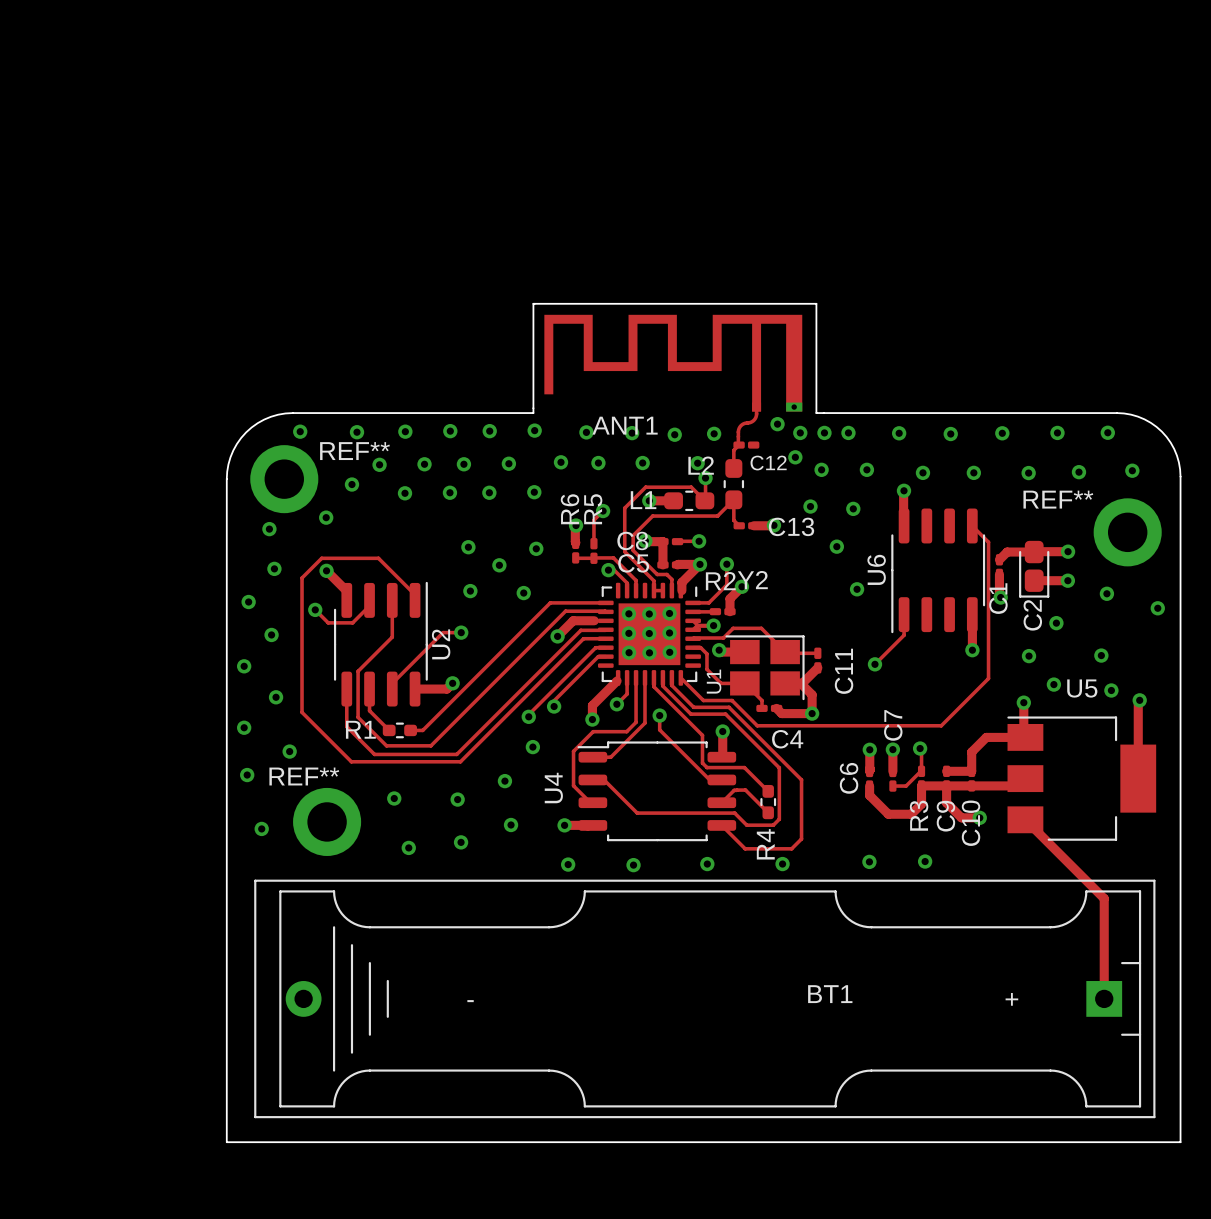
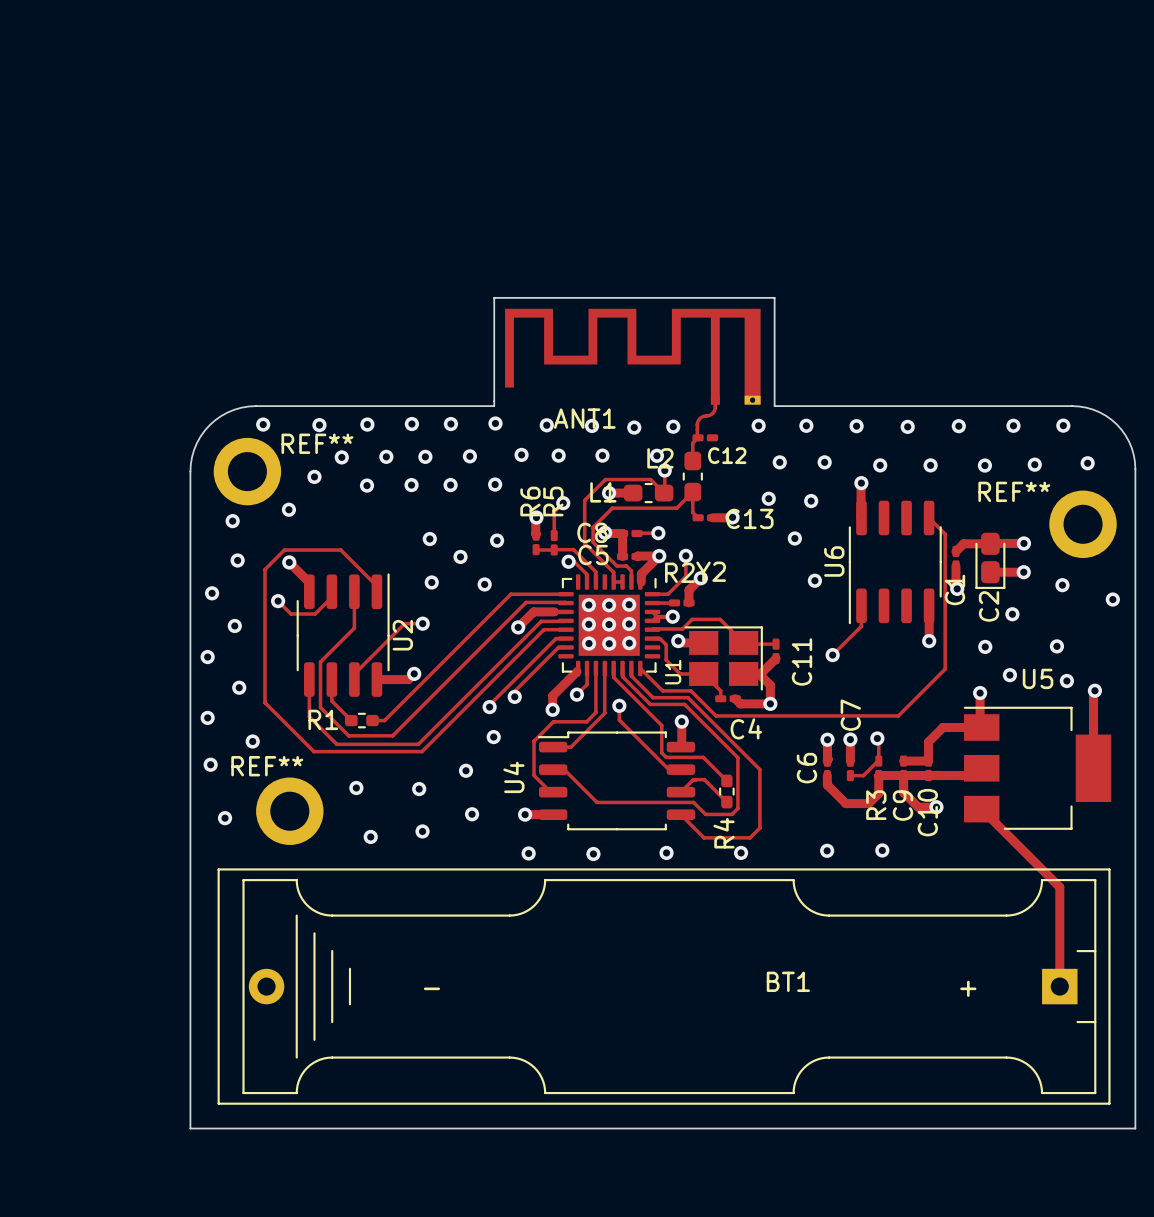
via: (777, 424) -> none
via: (824, 432) -> none
via: (795, 457) -> none

